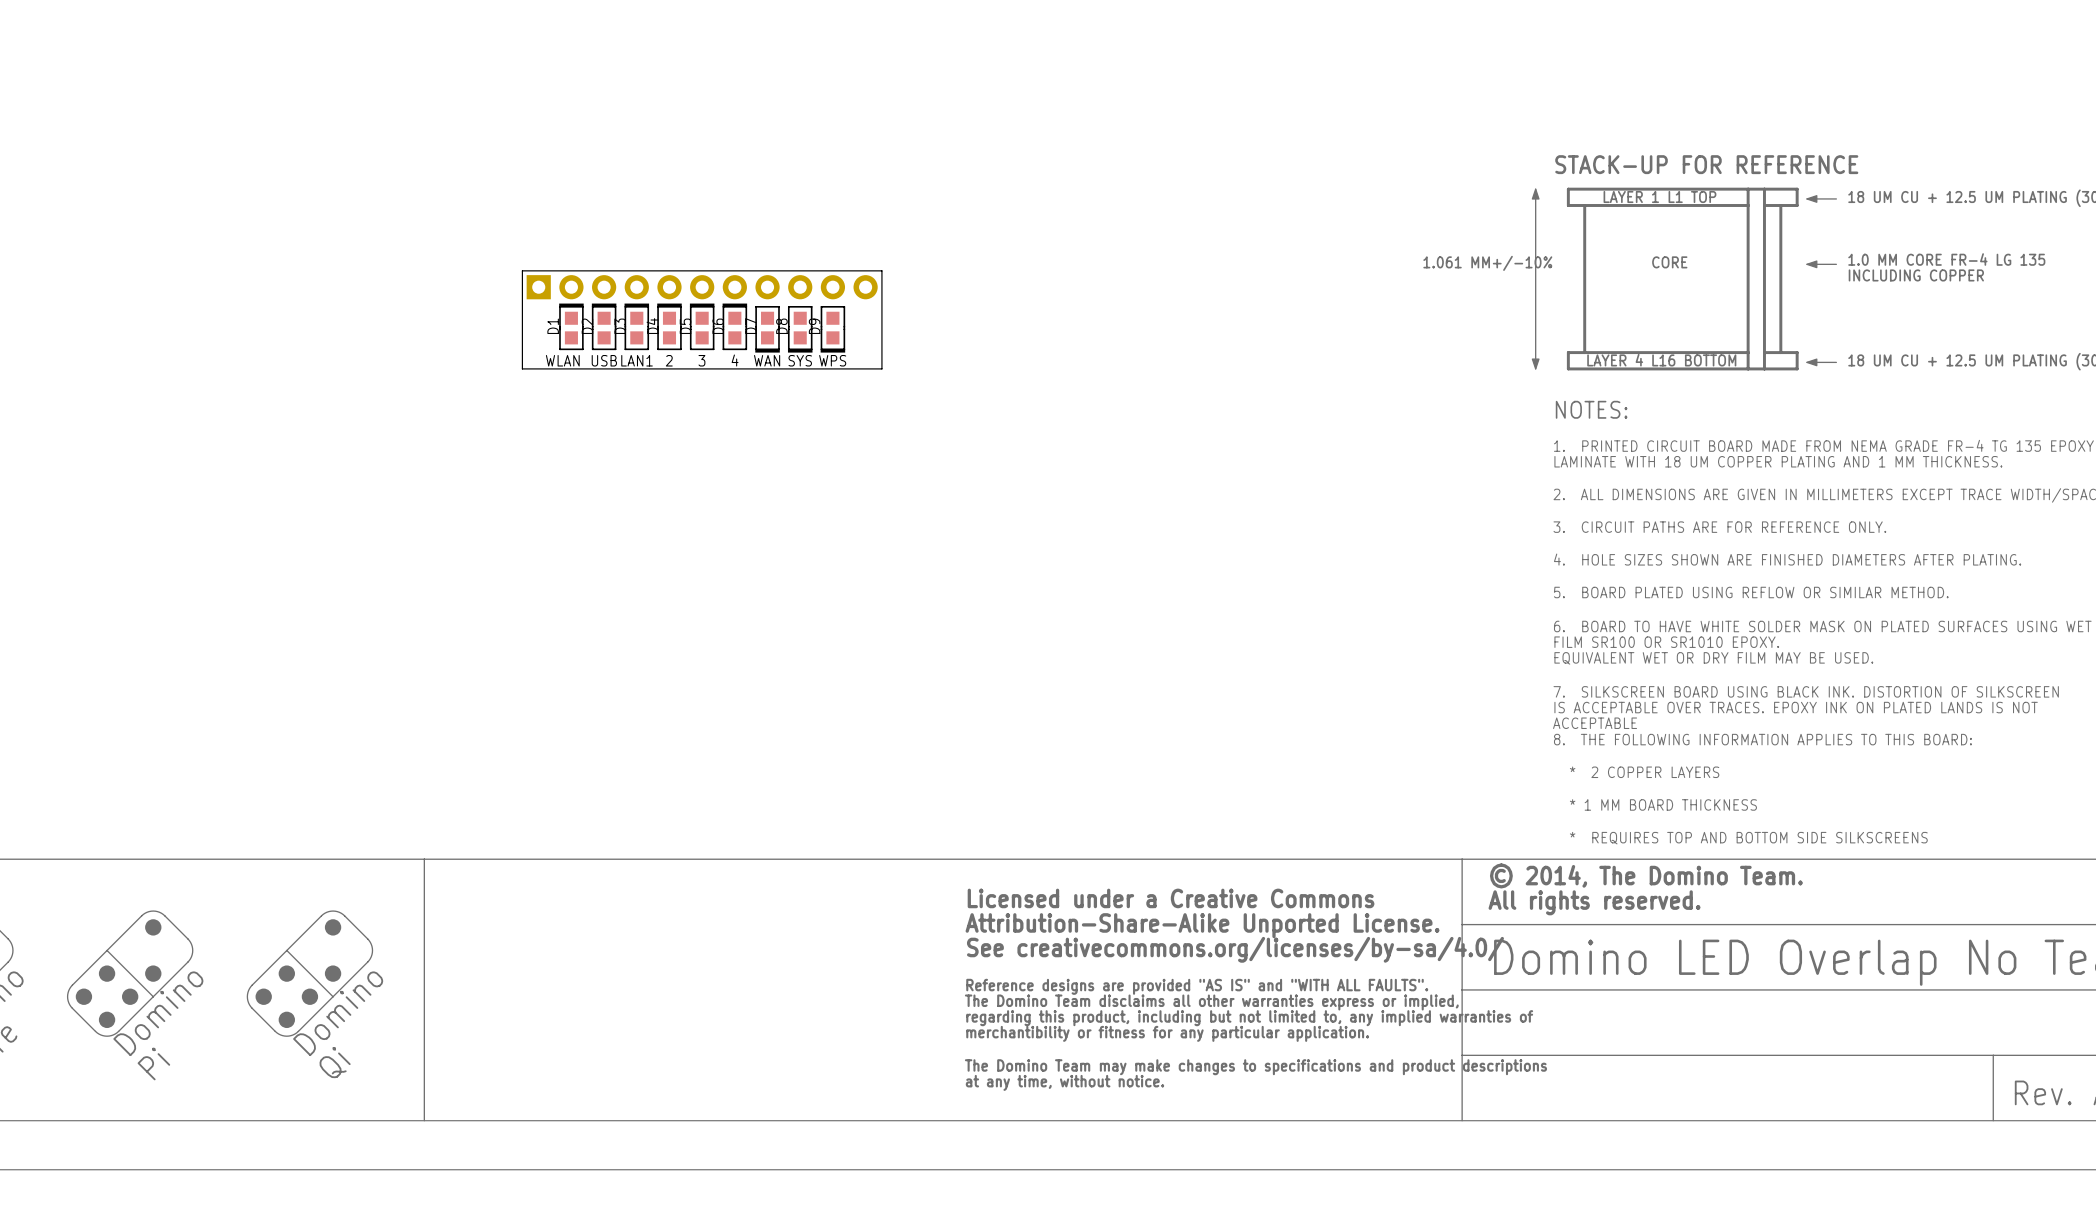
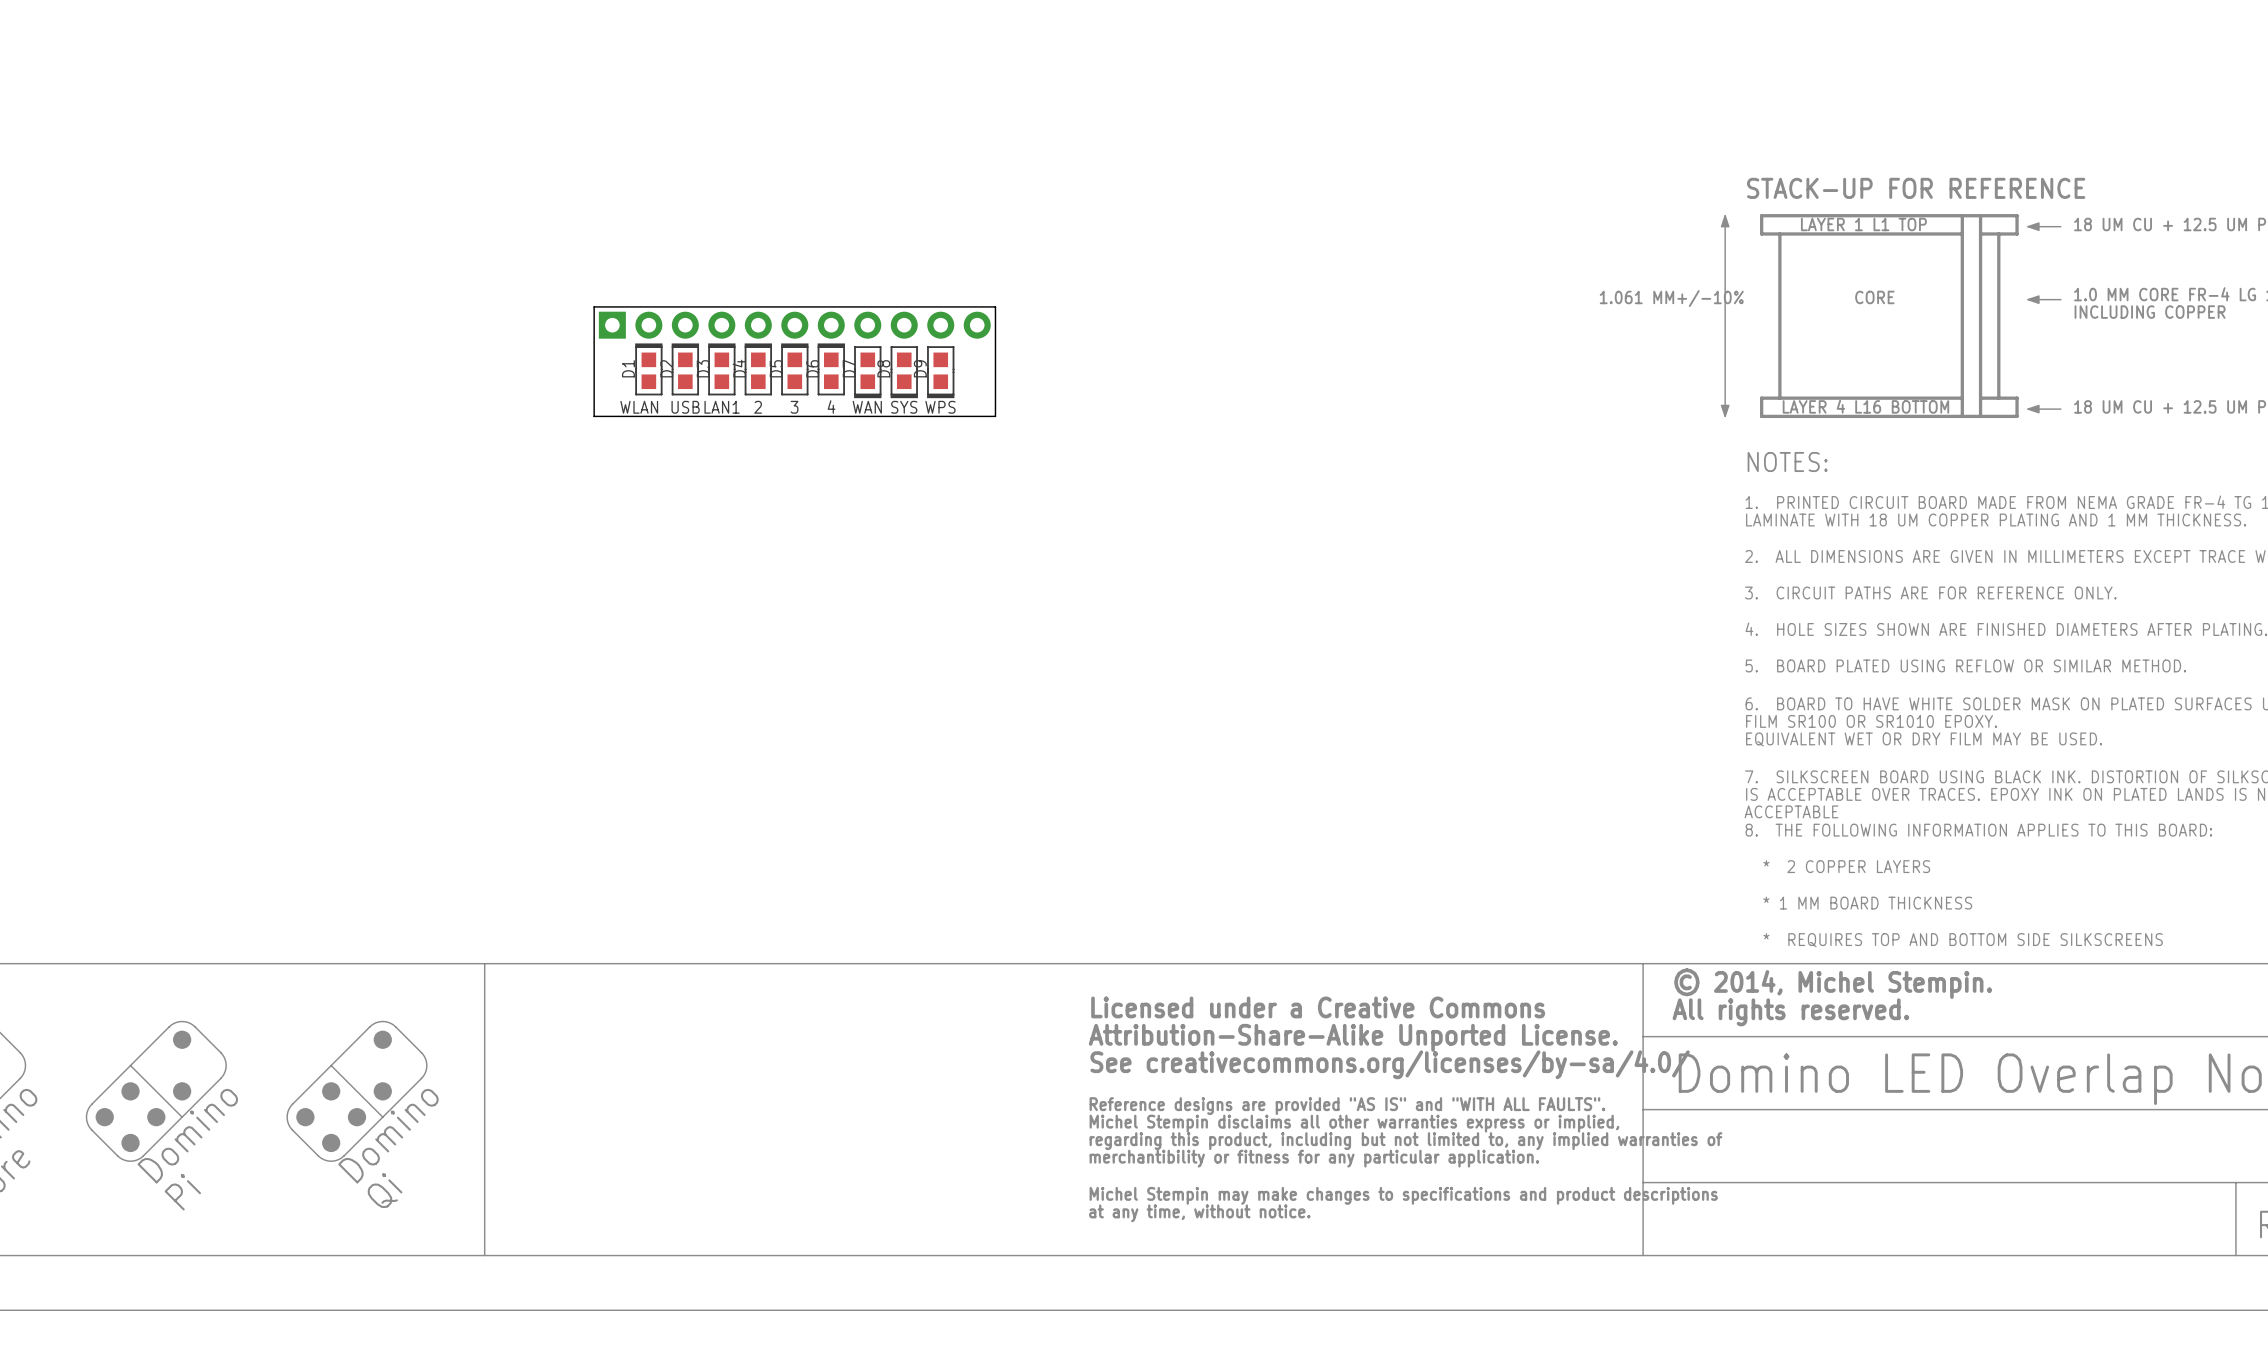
text: © 2014, The Domino Team. (1646, 875) -> © 2014, Michel Stempin. (1833, 983)
text: The Domino Team disclaims all other warranties express or implied, (1211, 1002) -> Michel Stempin disclaims all other warranties express or implied, (1354, 1123)
text: The Domino Team may make changes to specifications and product descriptions (1255, 1067) -> Michel Stempin may make changes to specifications and product descriptions (1403, 1195)

